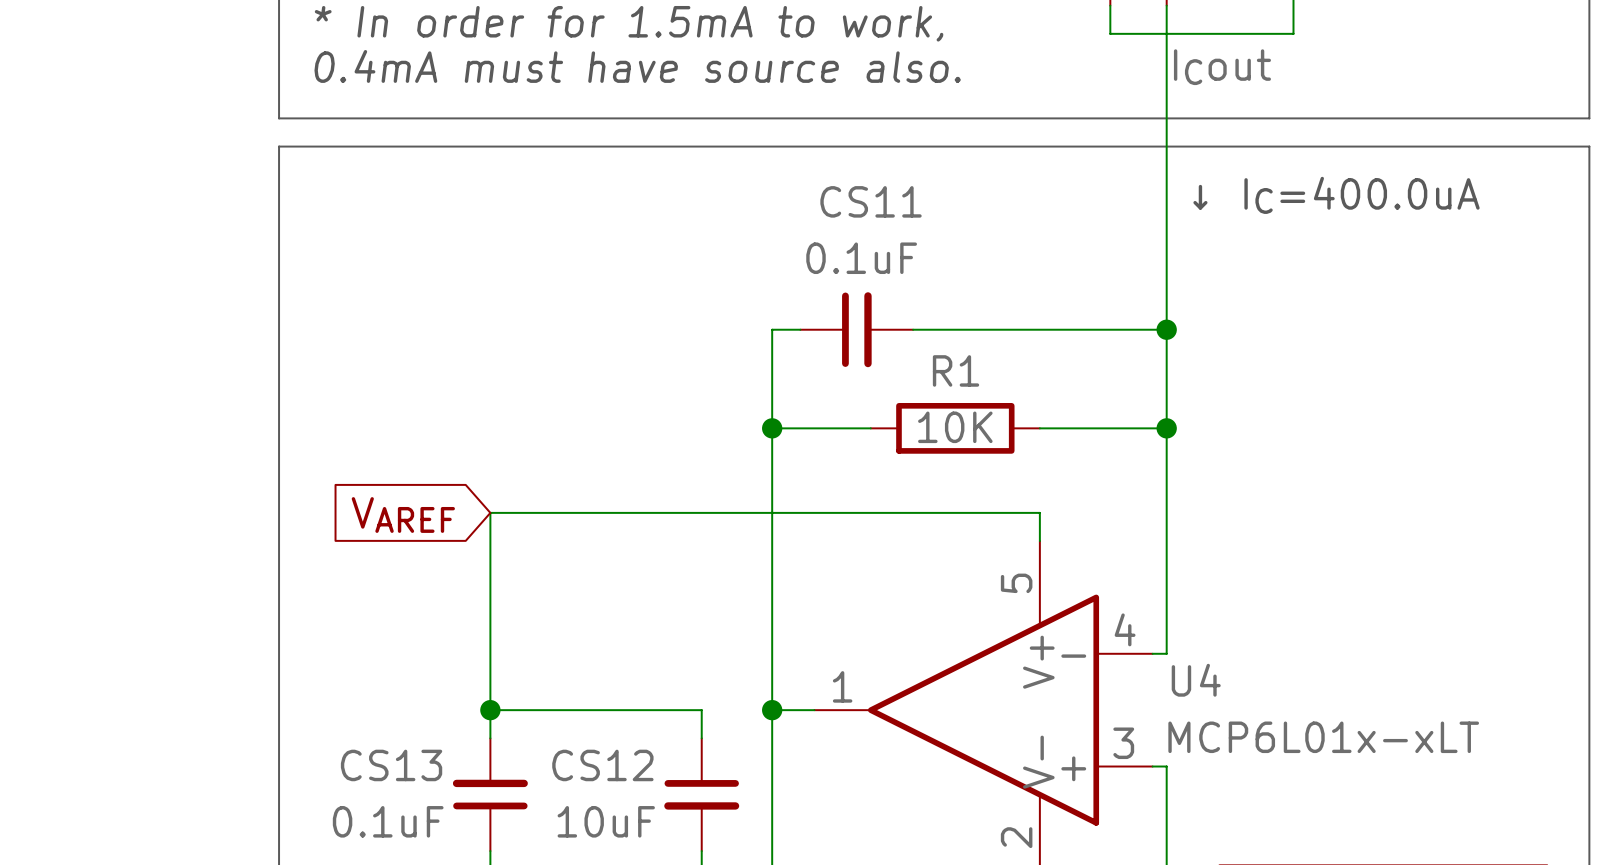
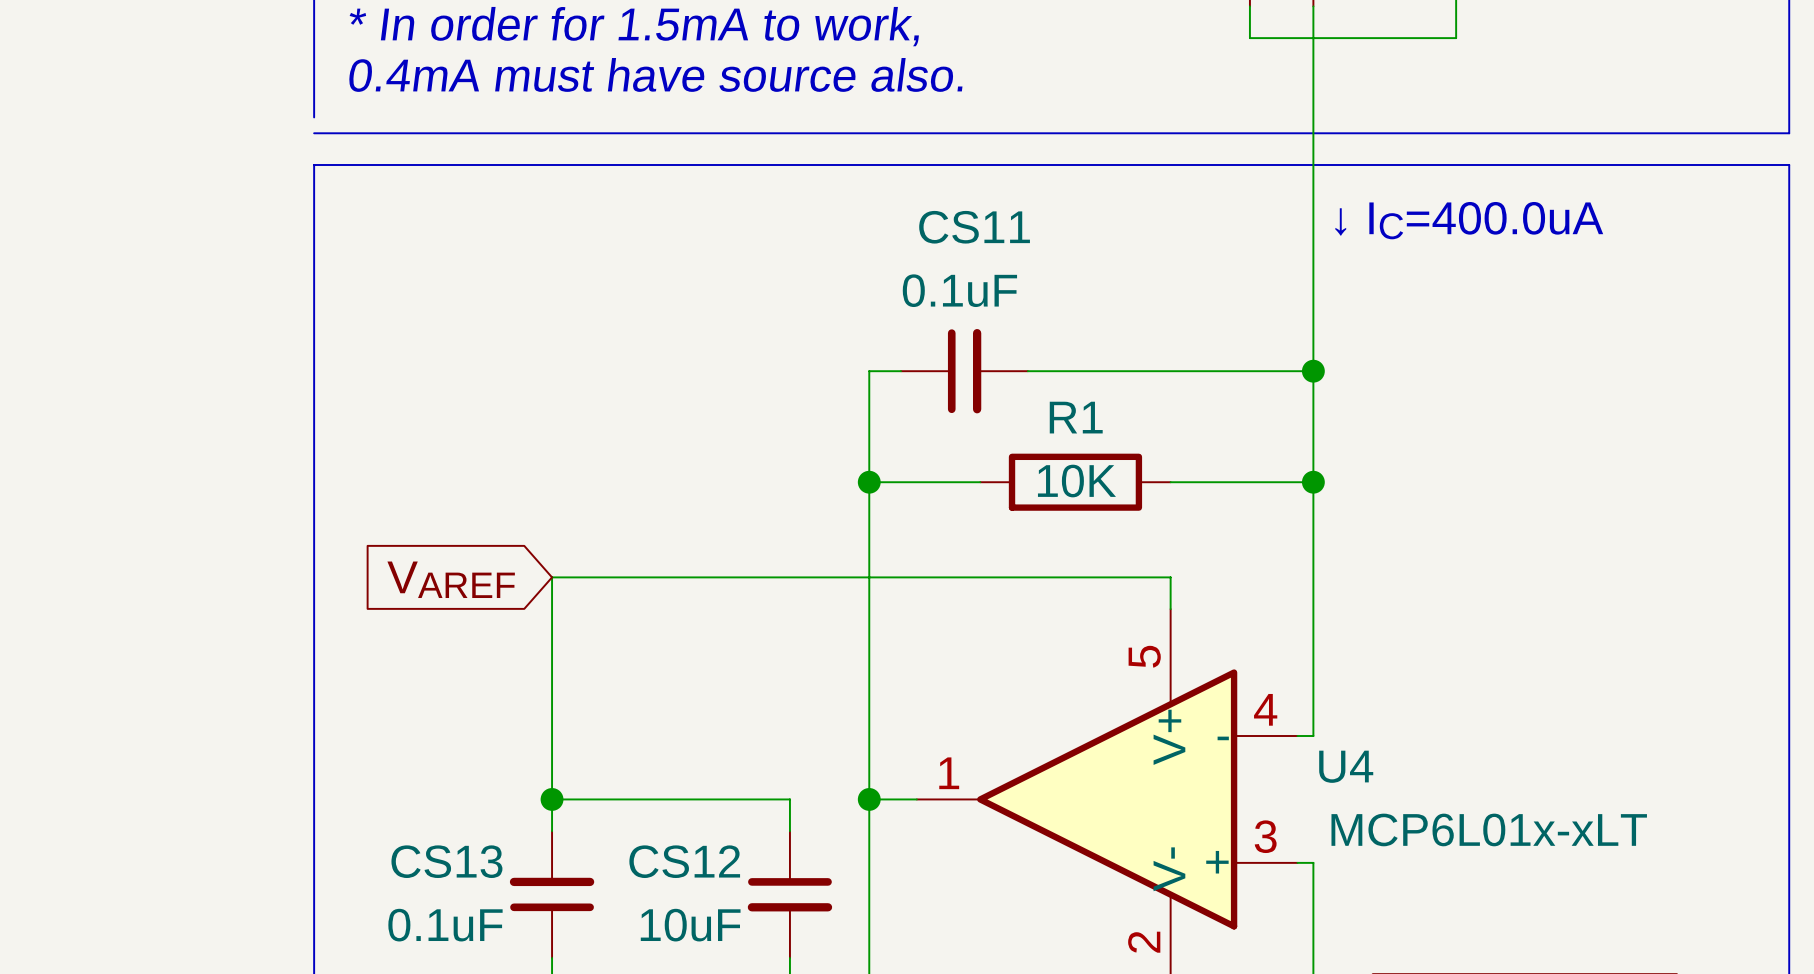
label: ICout (1222, 67) -> none
line: (279, 104) (279, 118) -> none

